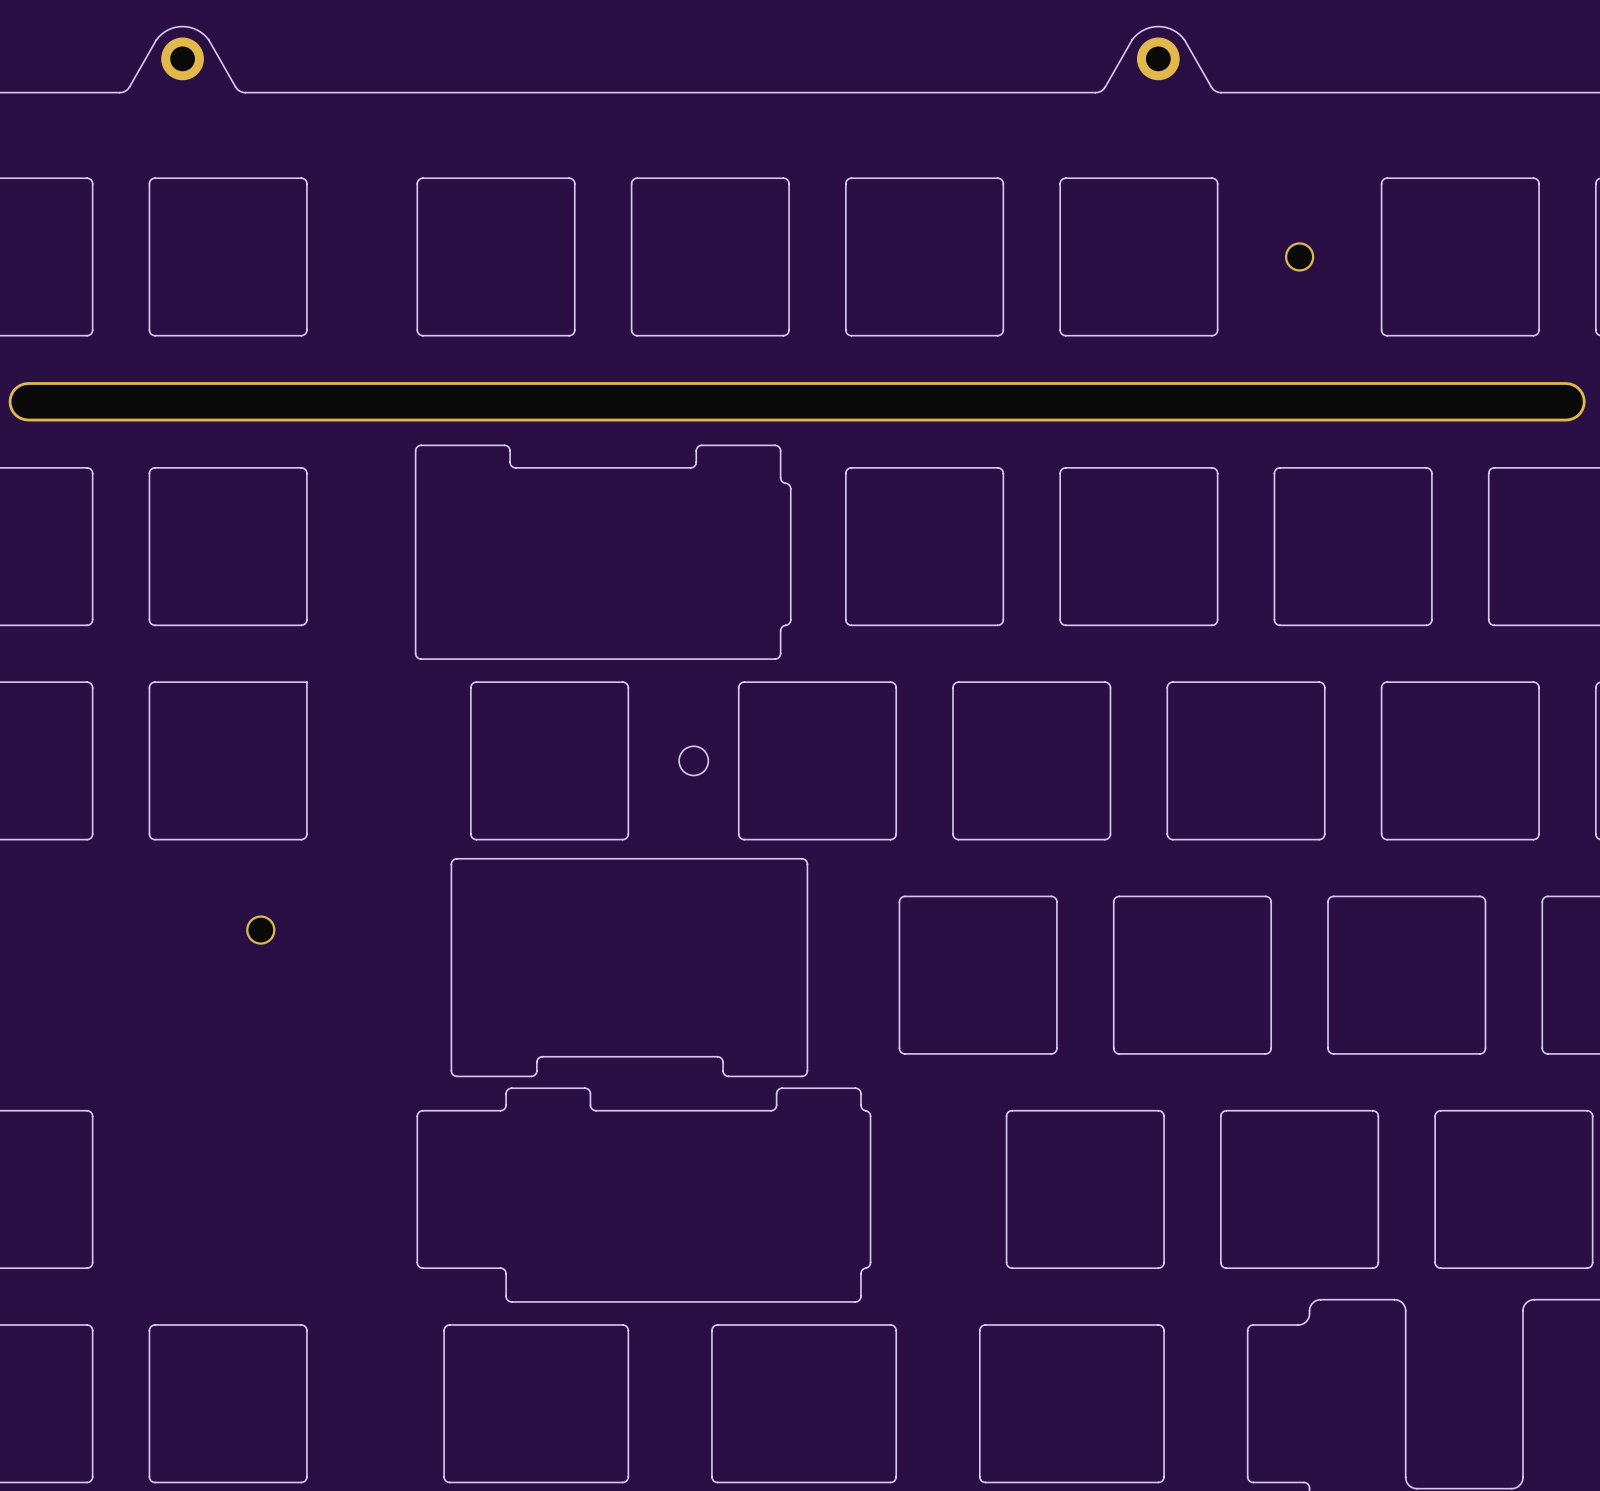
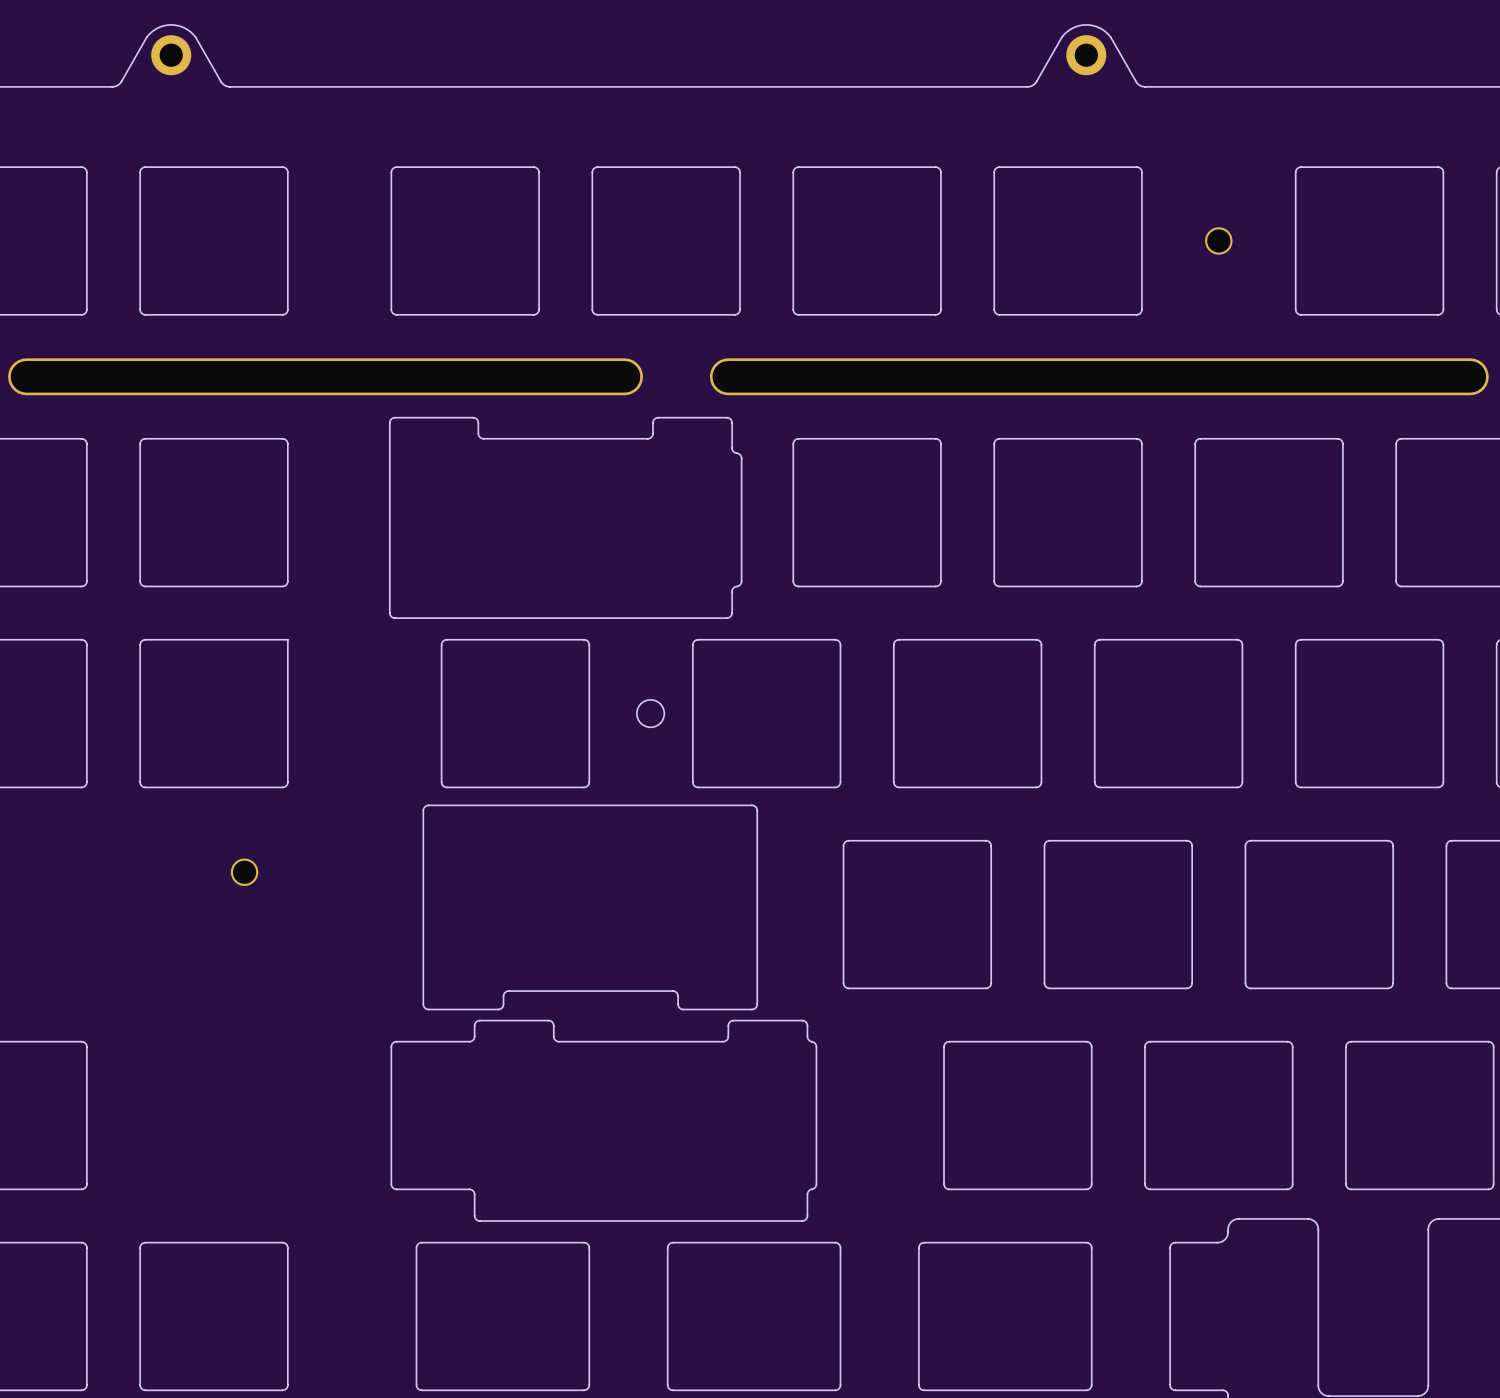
part: none -> (325, 376)
part: (797, 401) -> none
part: none -> (1099, 376)

